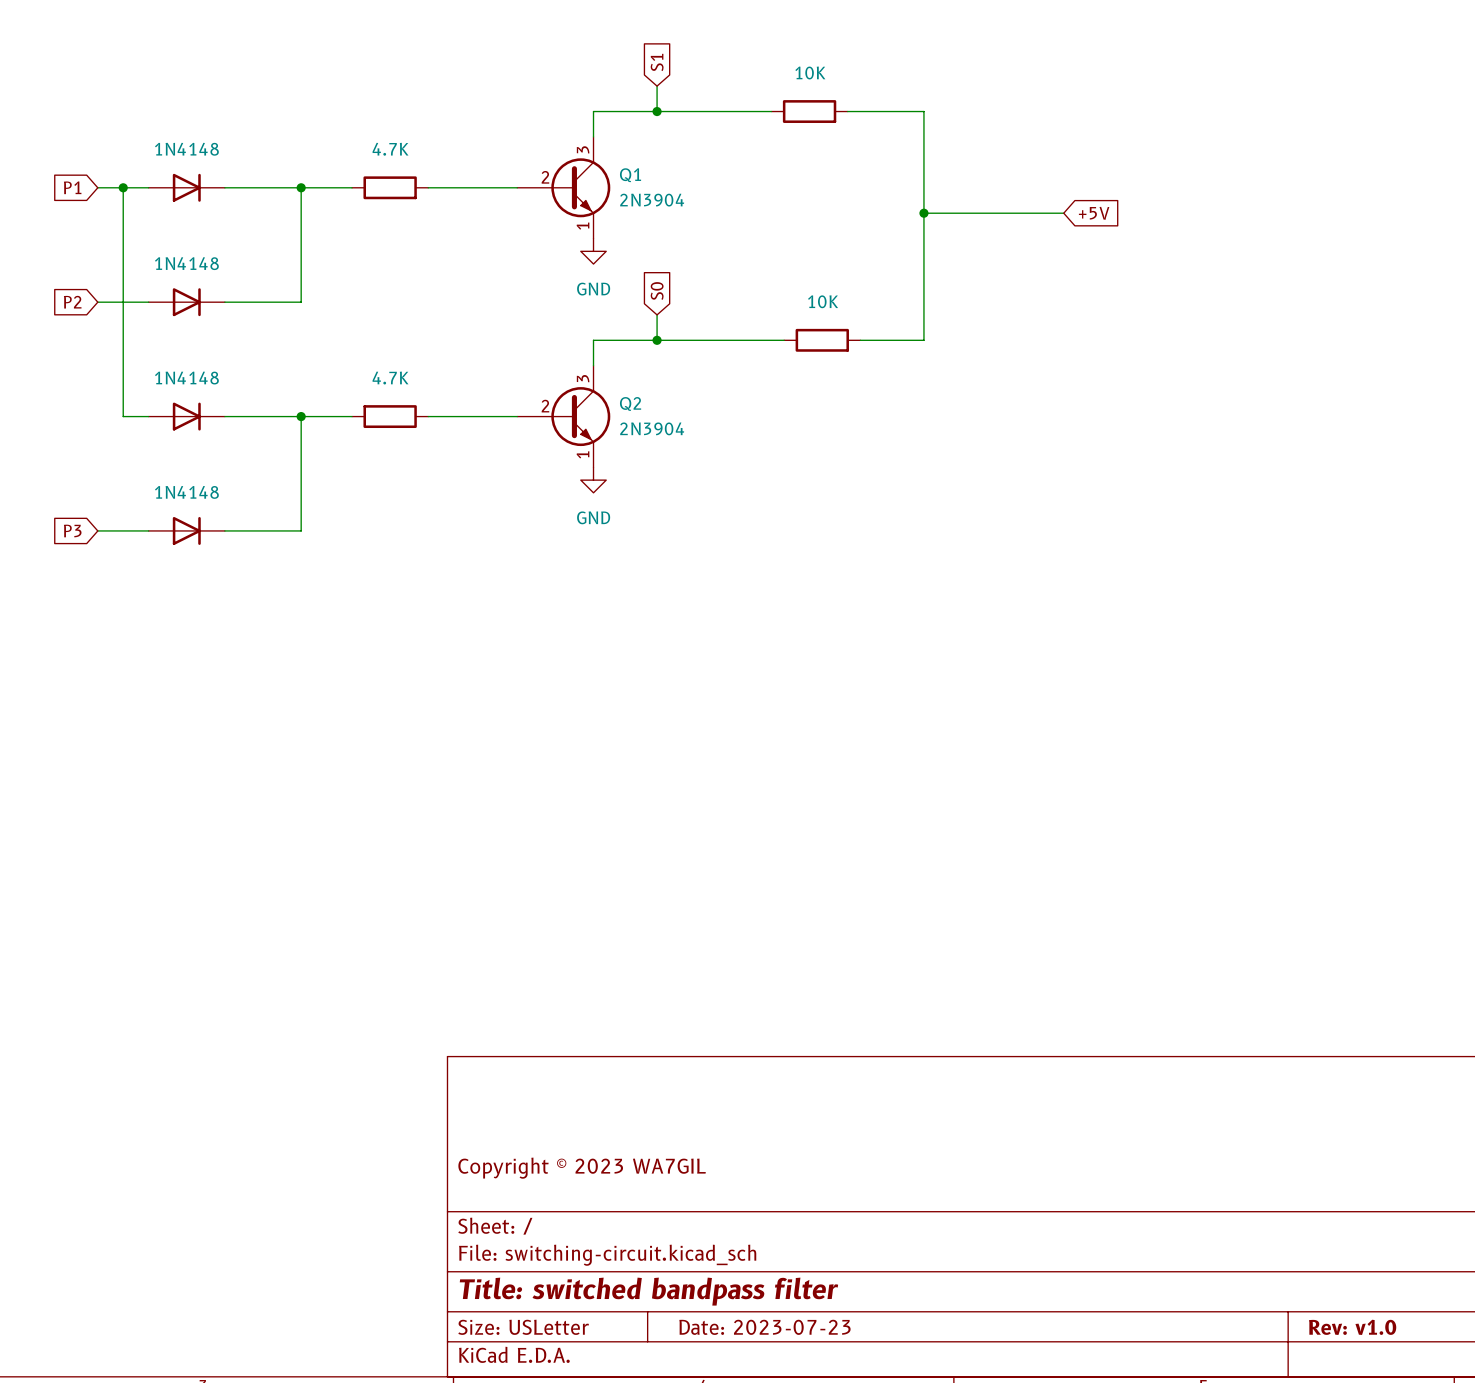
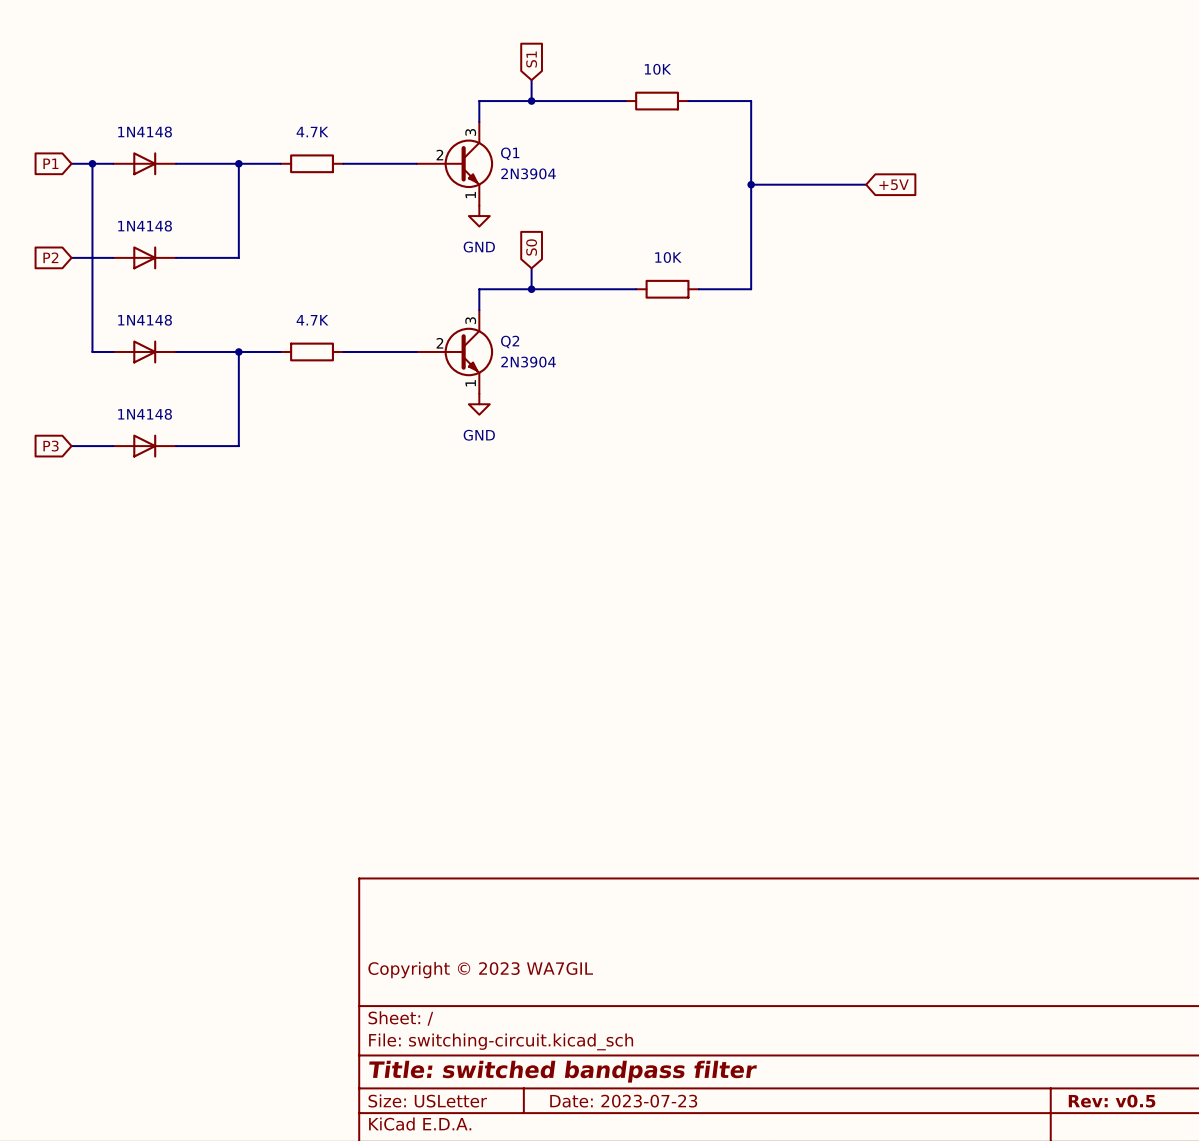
title block: Rev: v1.0 (1352, 1327) -> Rev: v0.5 (1112, 1101)

